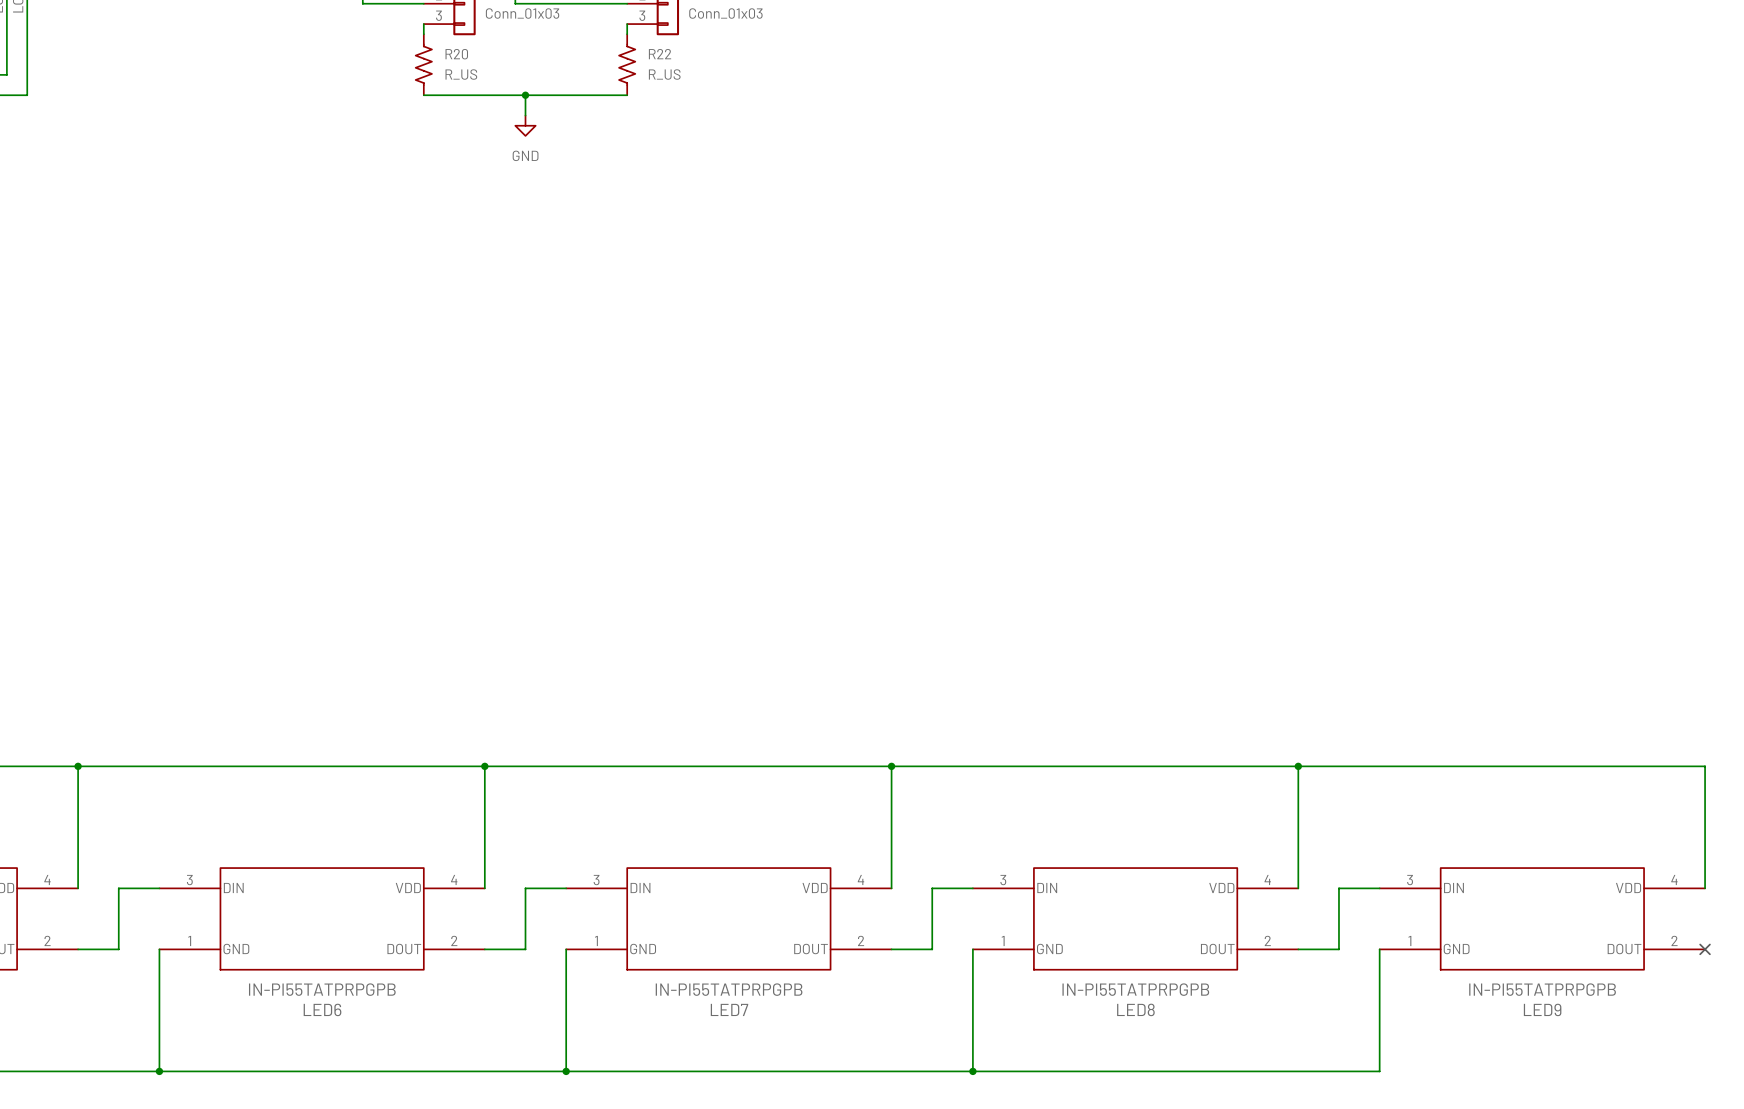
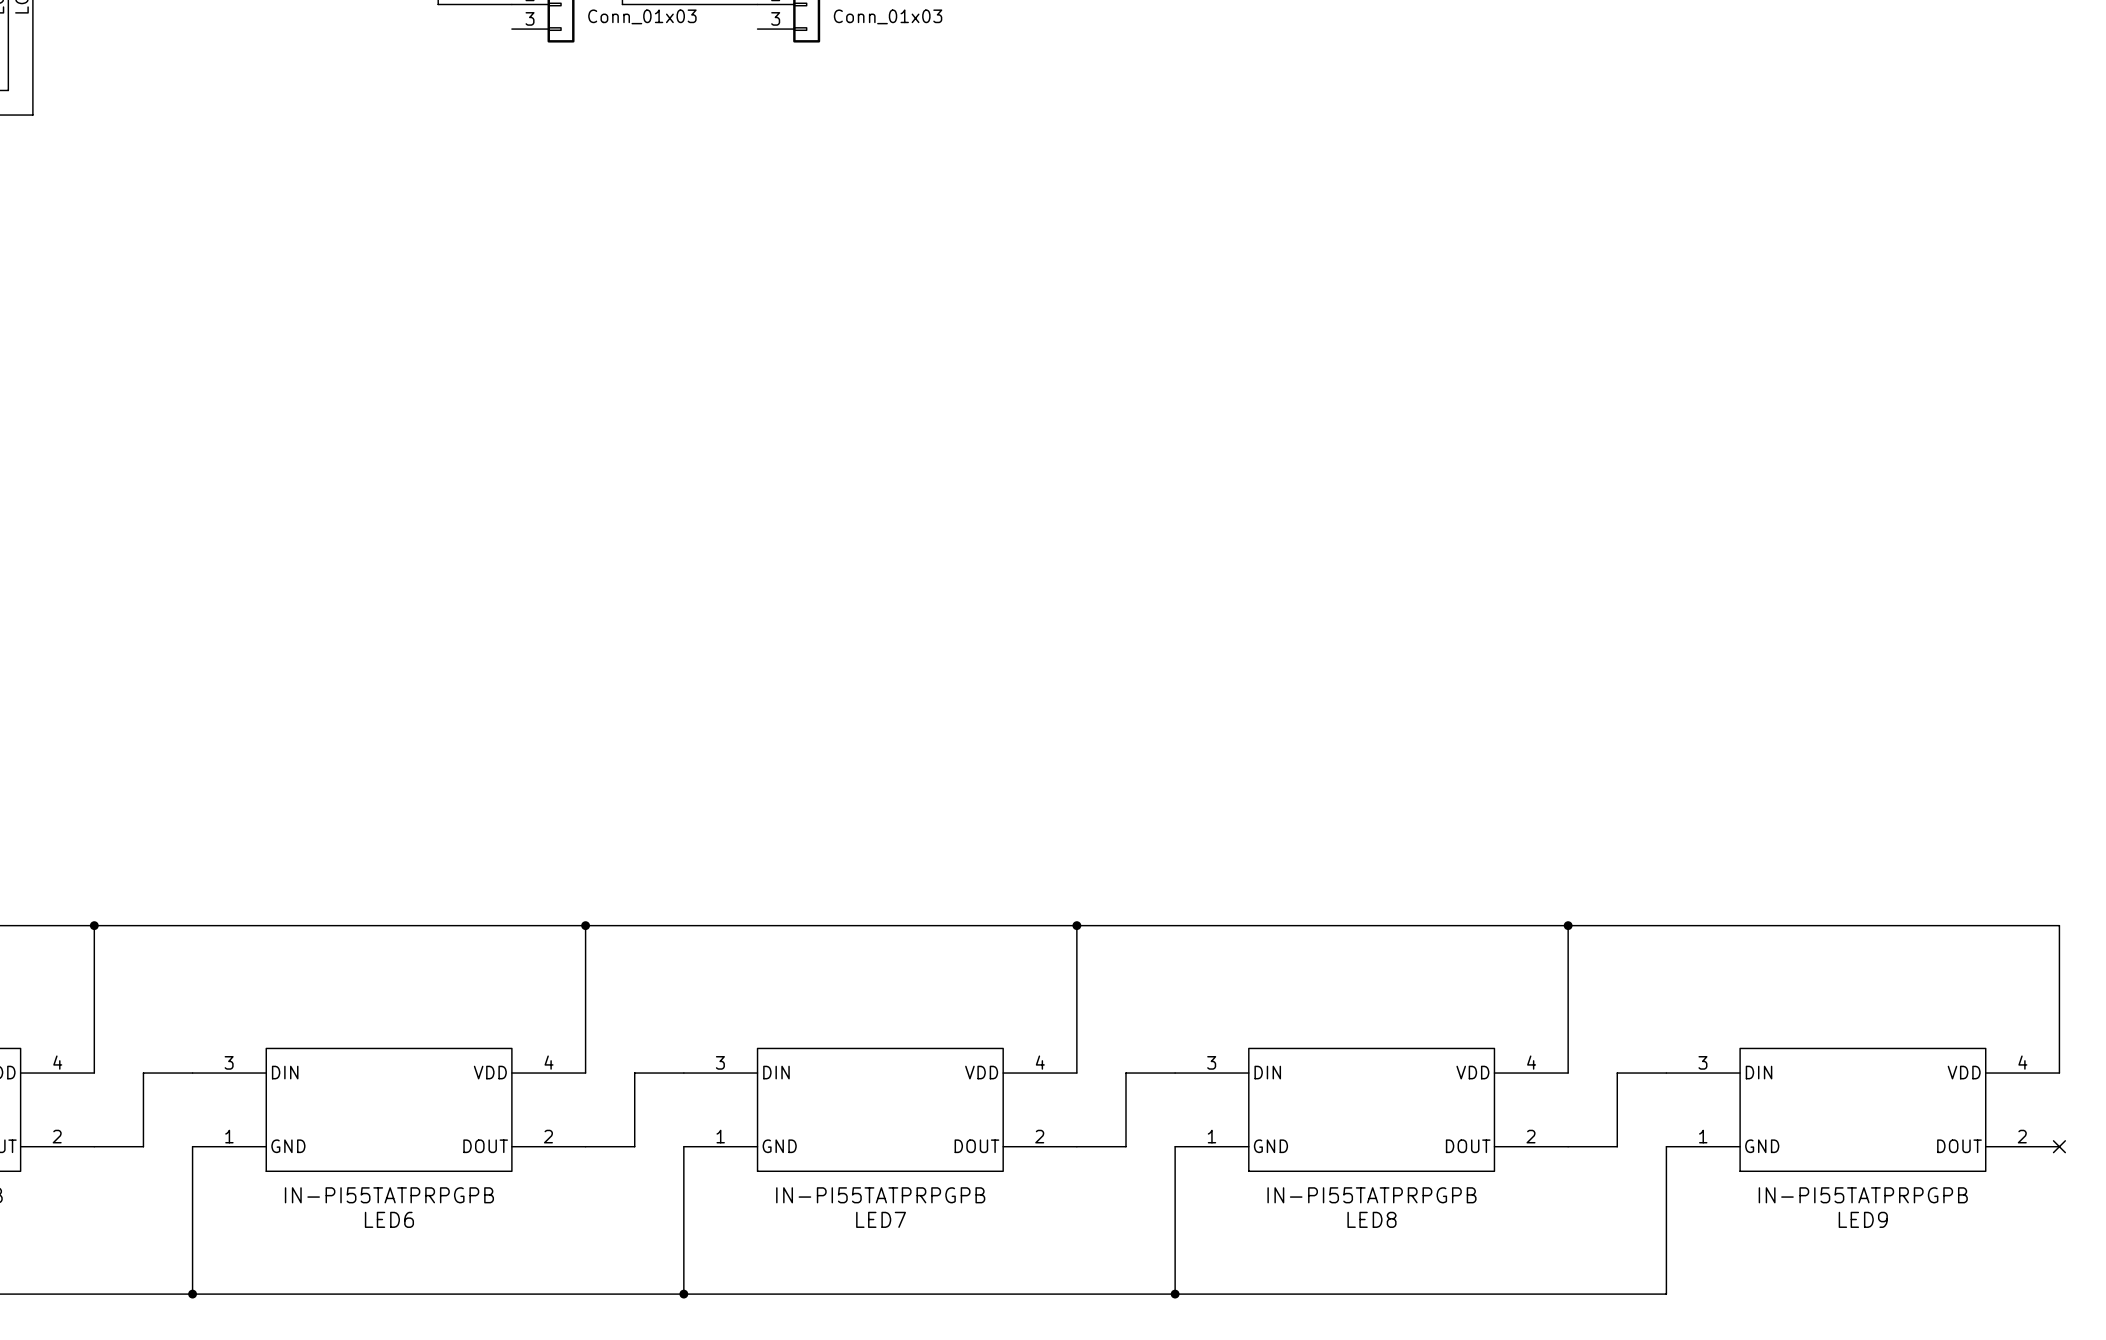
wire: (423, 24) (423, 34) -> none
wire: (627, 24) (627, 34) -> none
R20: R_US (423, 64) -> none
R22: R_US (627, 64) -> none
wire: (423, 95) (627, 95) -> none
wire: (525, 95) (525, 115) -> none
junction: (525, 95) -> none
power symbol: GND (525, 125) -> none

